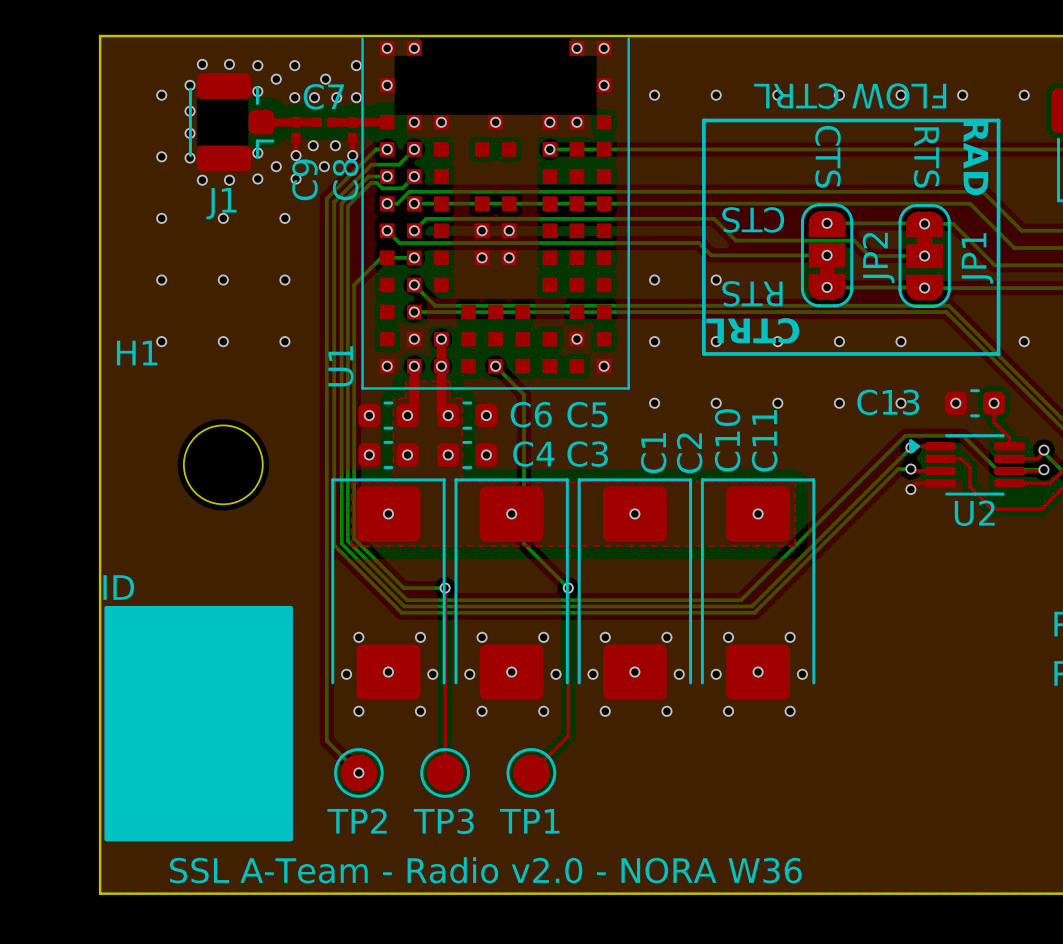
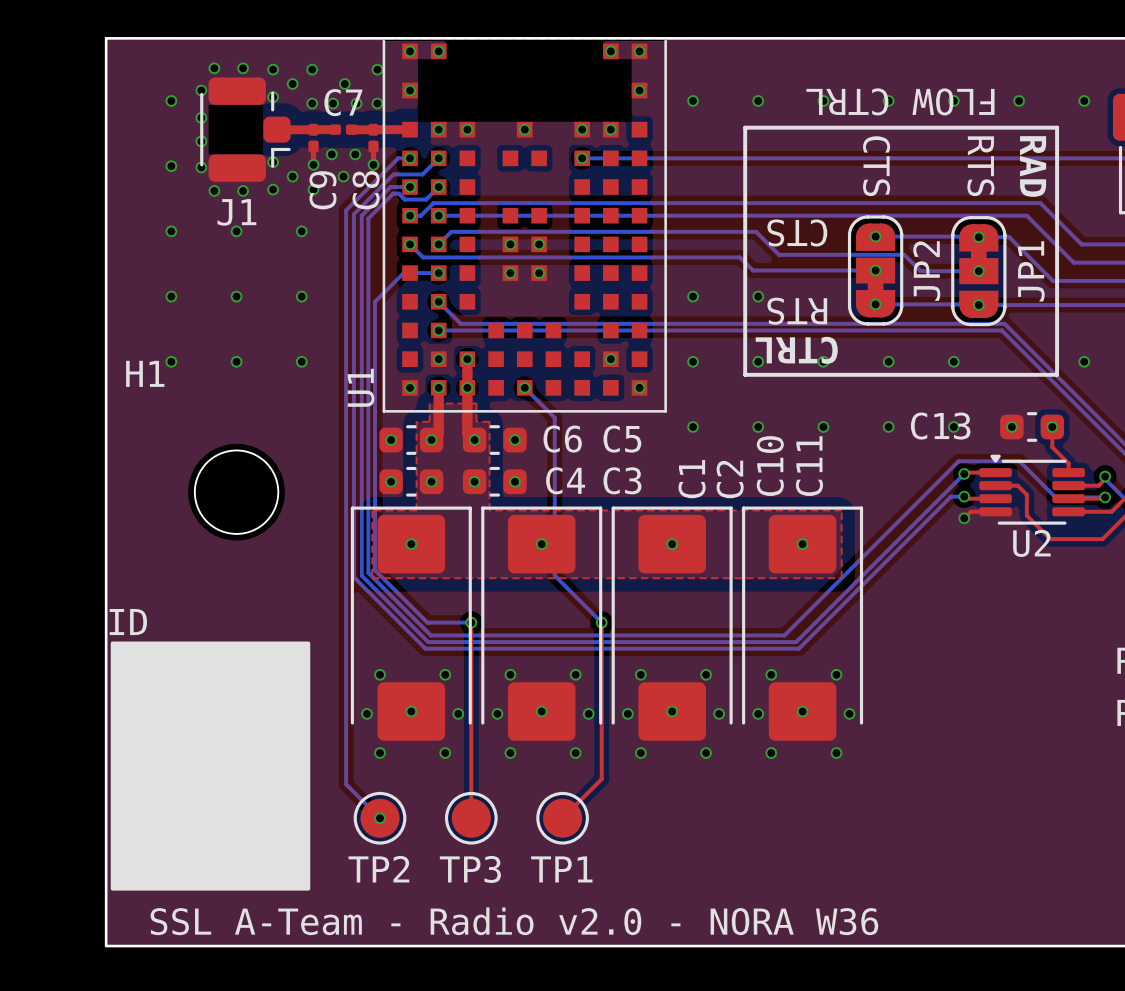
U2 footprint: [909, 434, 1025, 496] -> [979, 454, 1085, 525]

